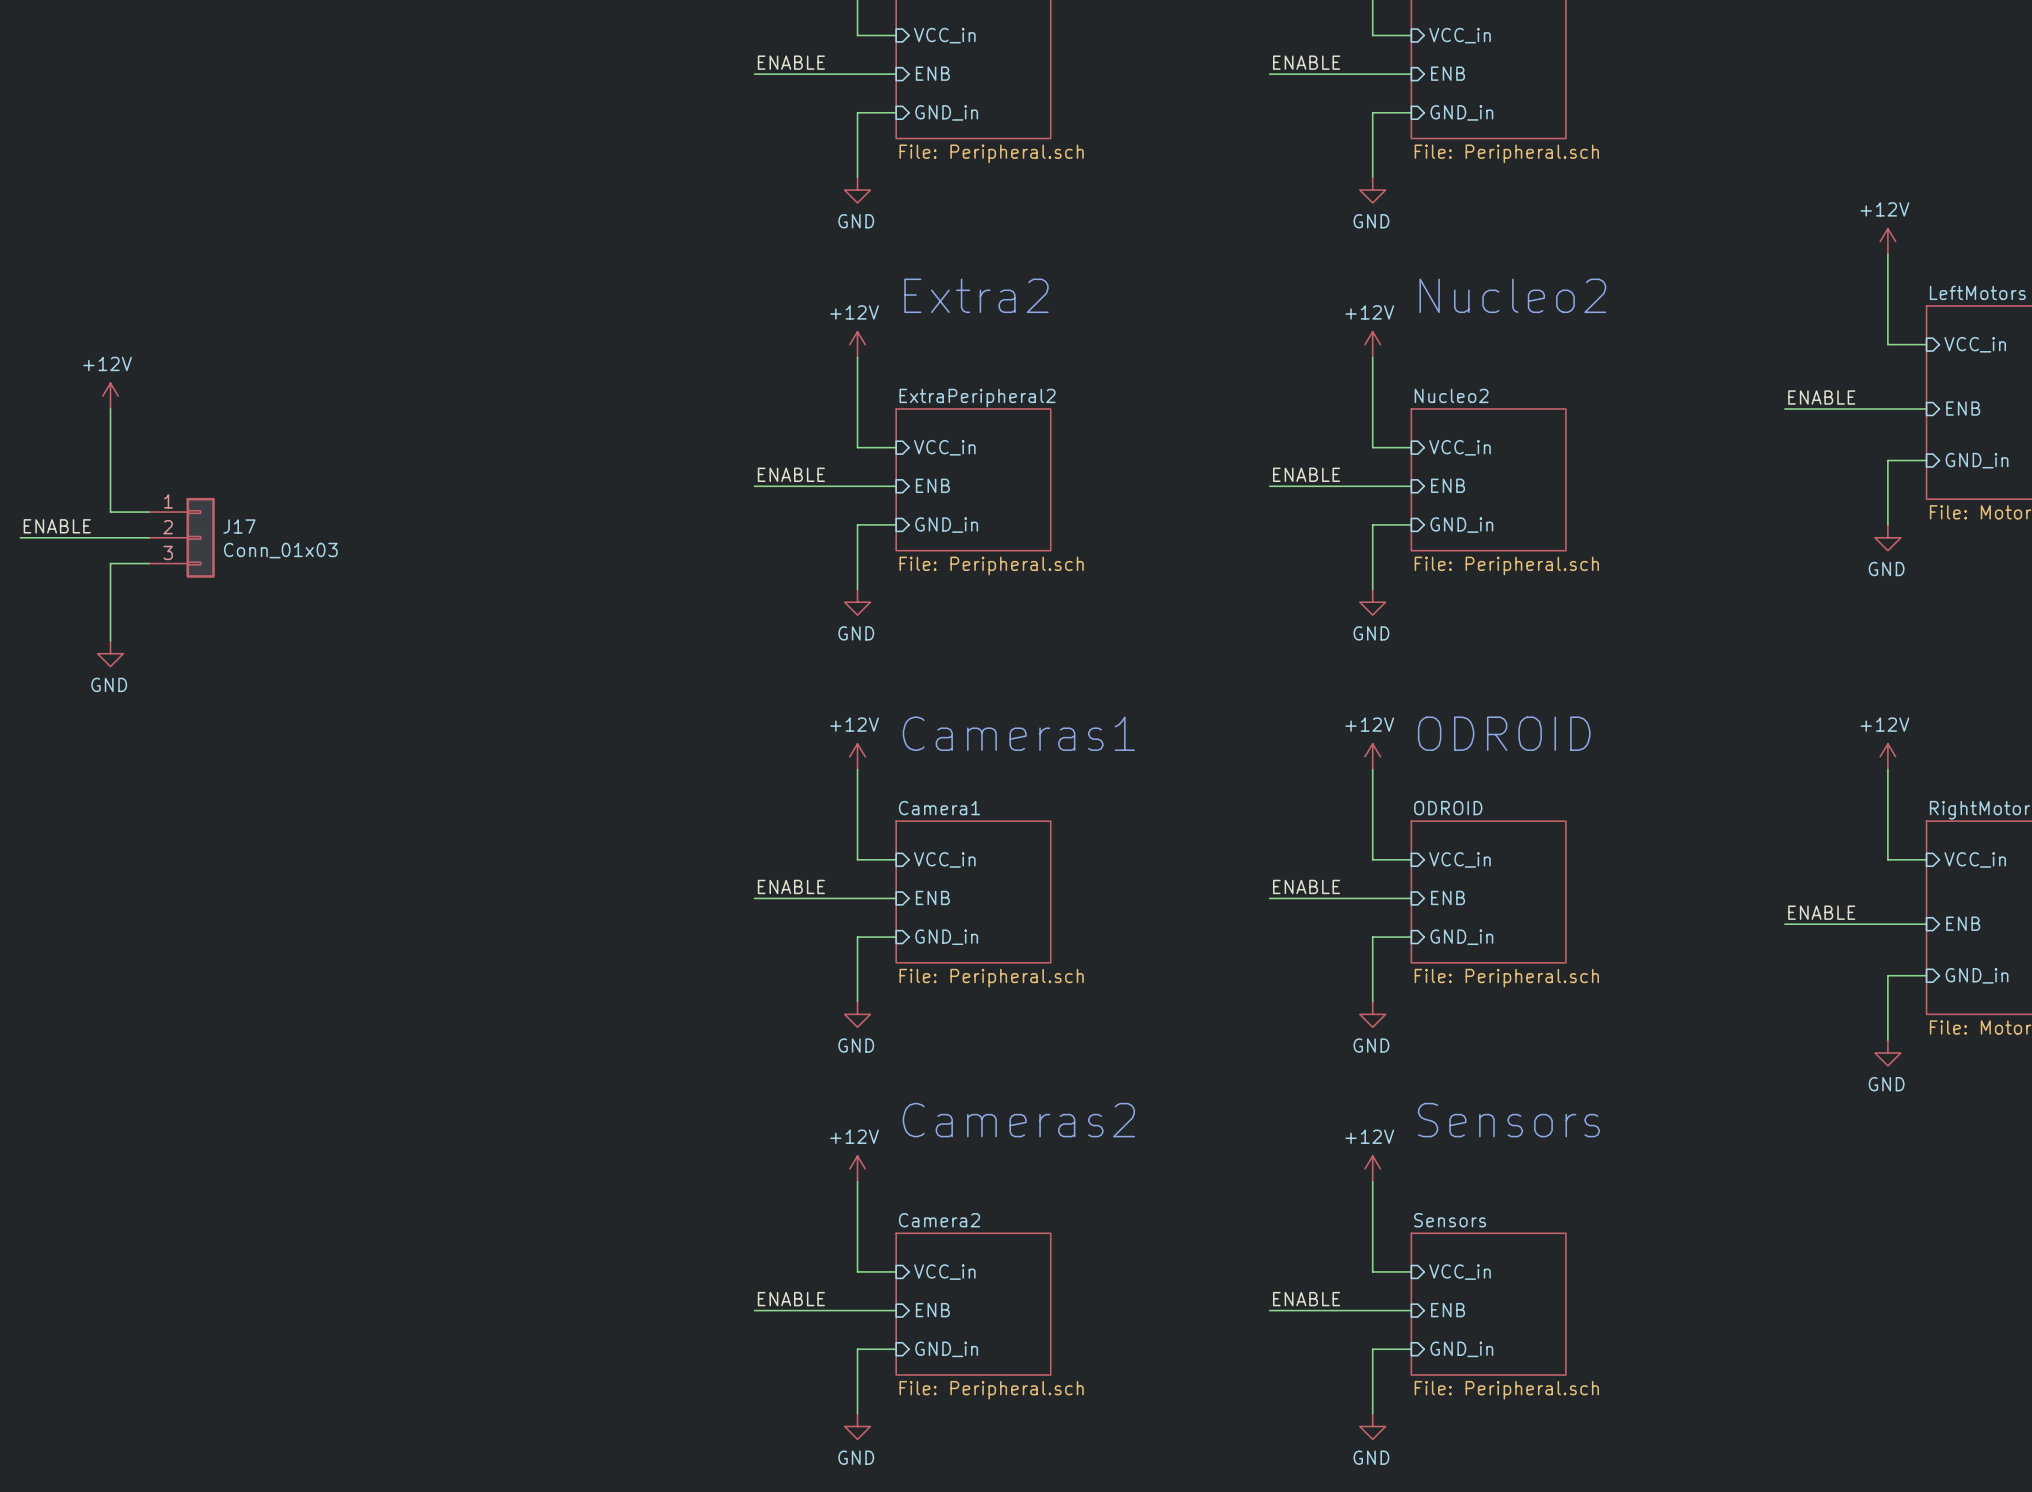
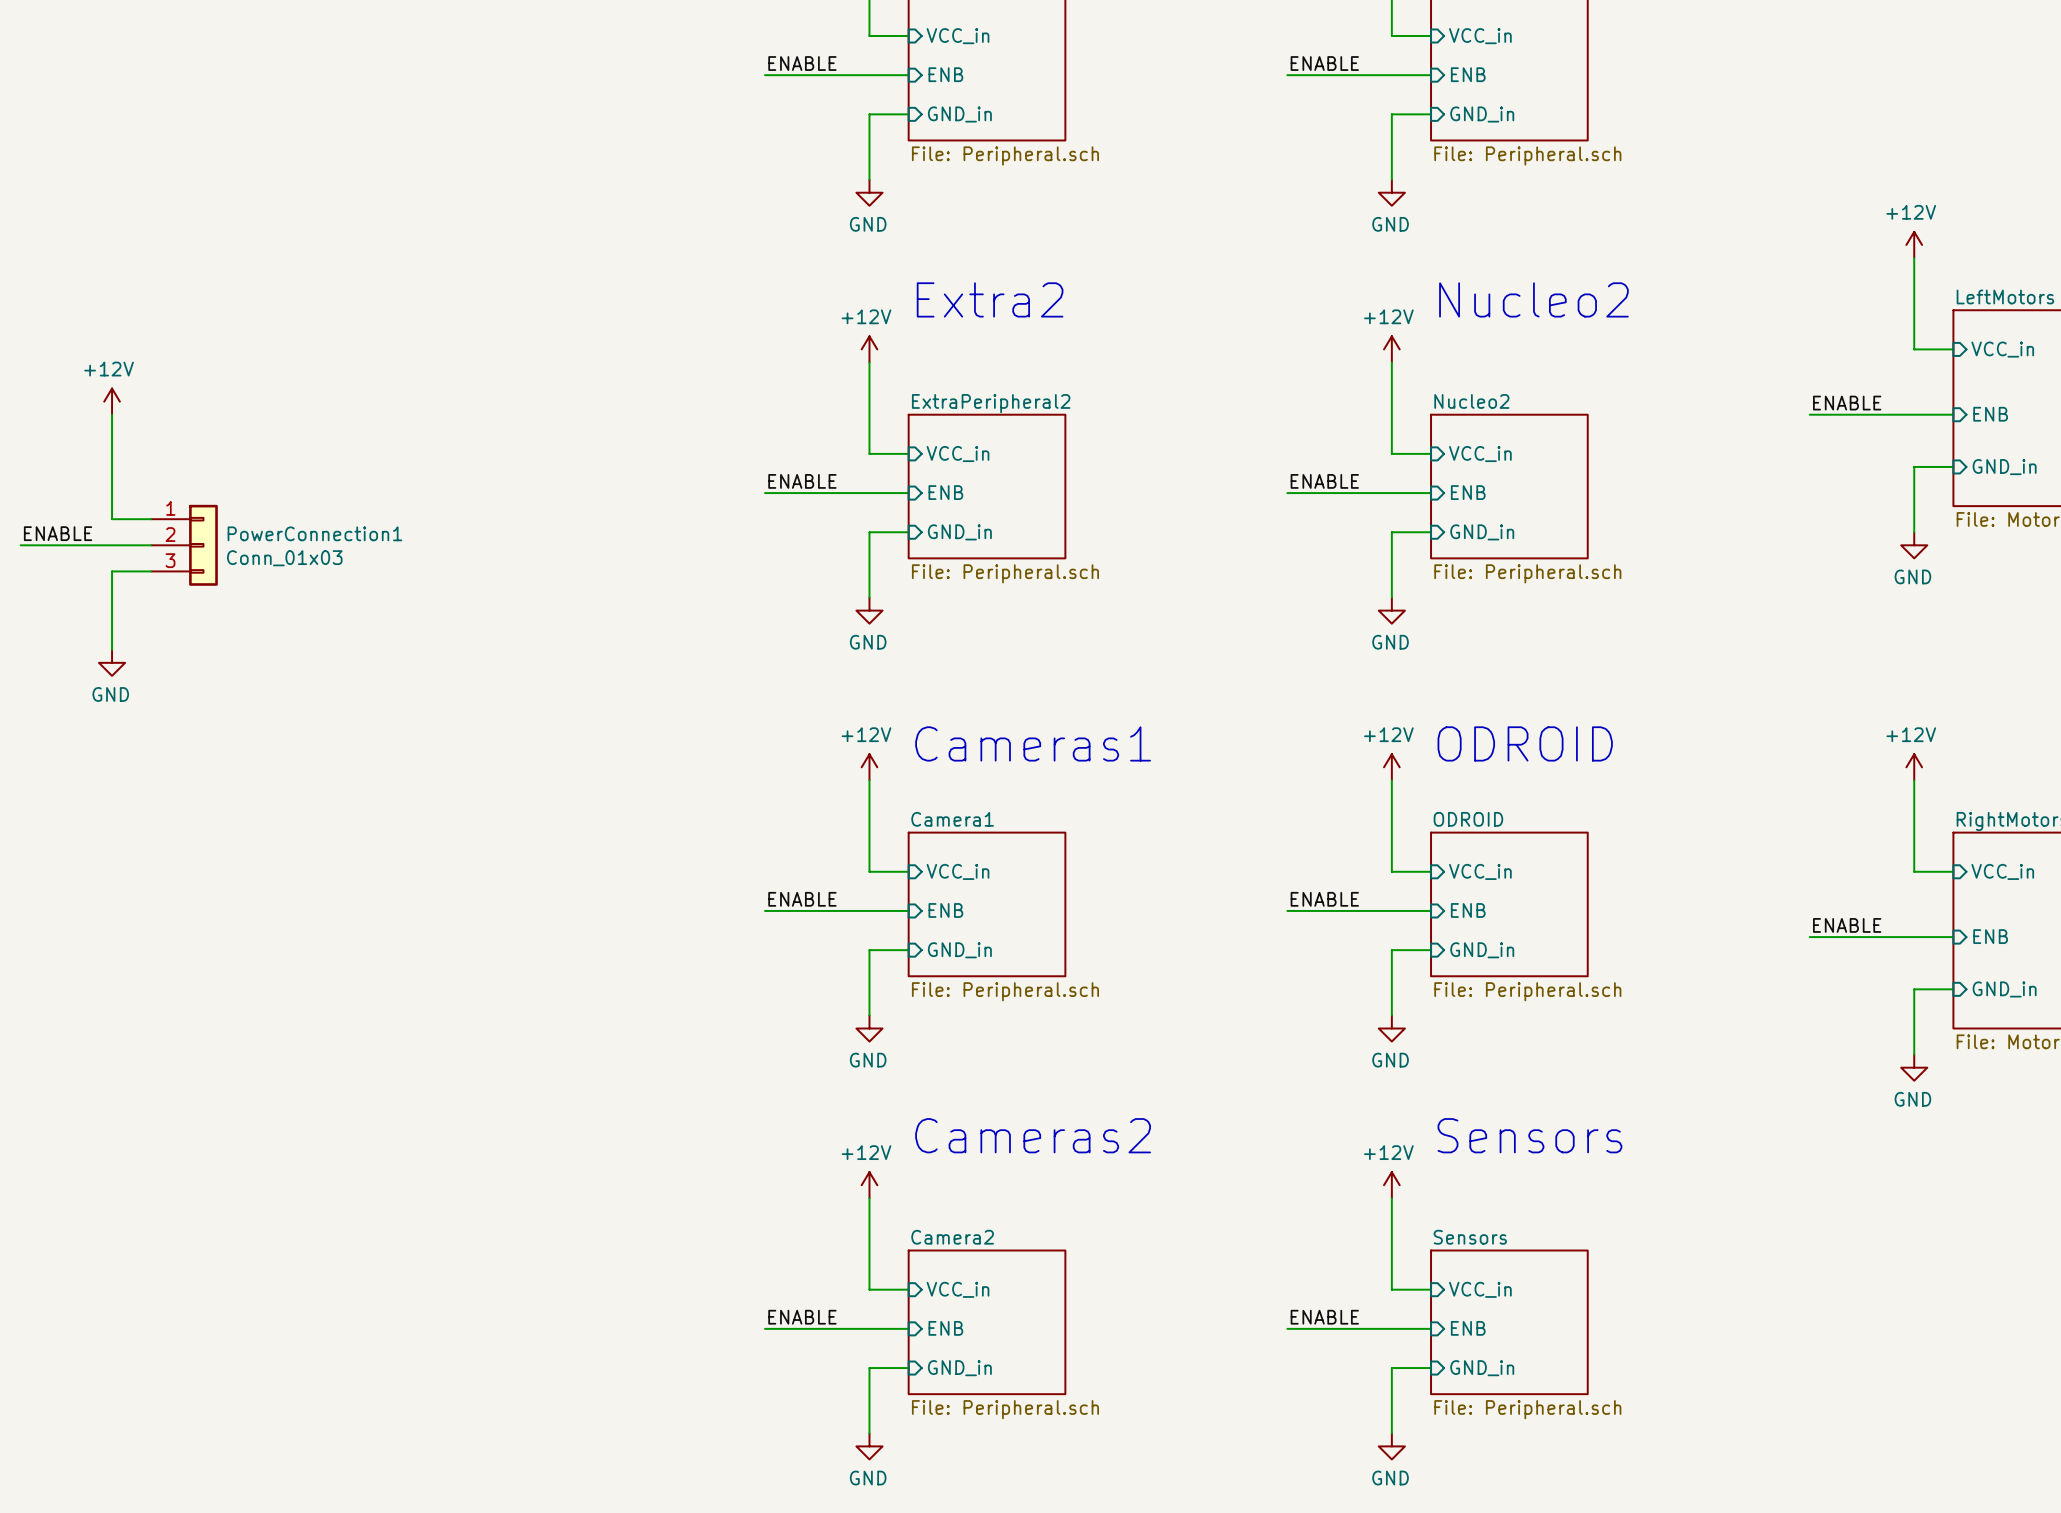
J17 name: J17 (239, 526) -> PowerConnection1 (314, 533)

